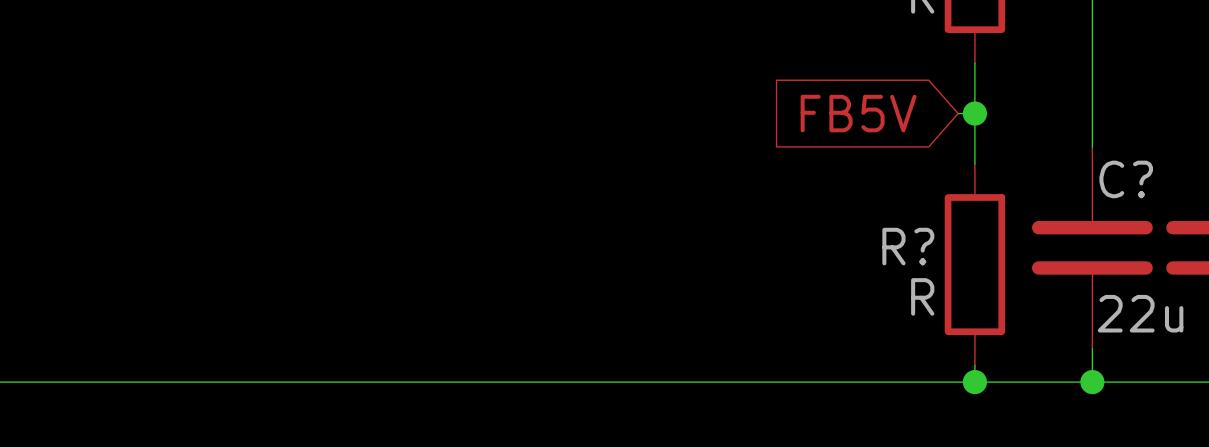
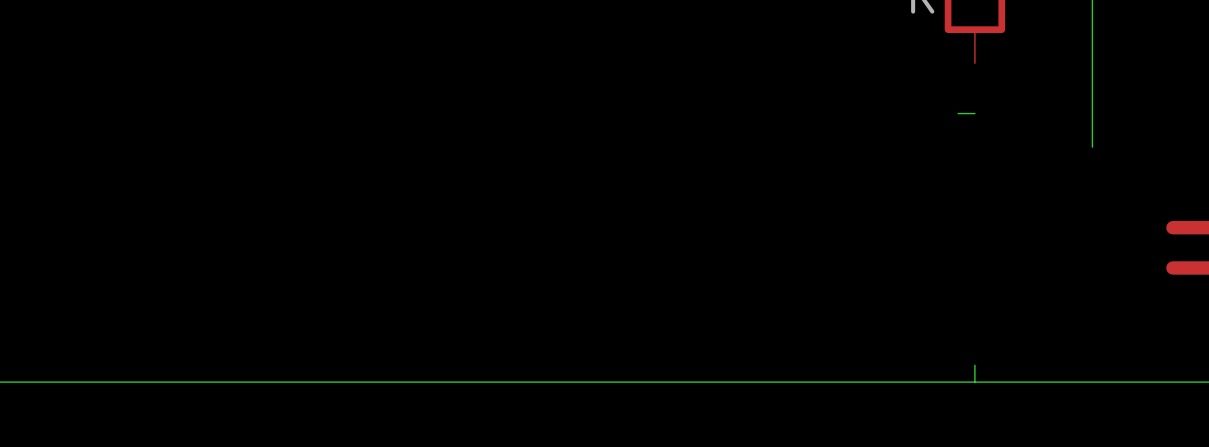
wire: (974, 63) (974, 163) -> none
global label: FB5V (858, 113) -> none
junction: (974, 113) -> none
C?: 22u (1092, 247) -> none
R?: R (974, 264) -> none
wire: (1092, 348) (1092, 382) -> none
junction: (974, 382) -> none
junction: (1092, 382) -> none

